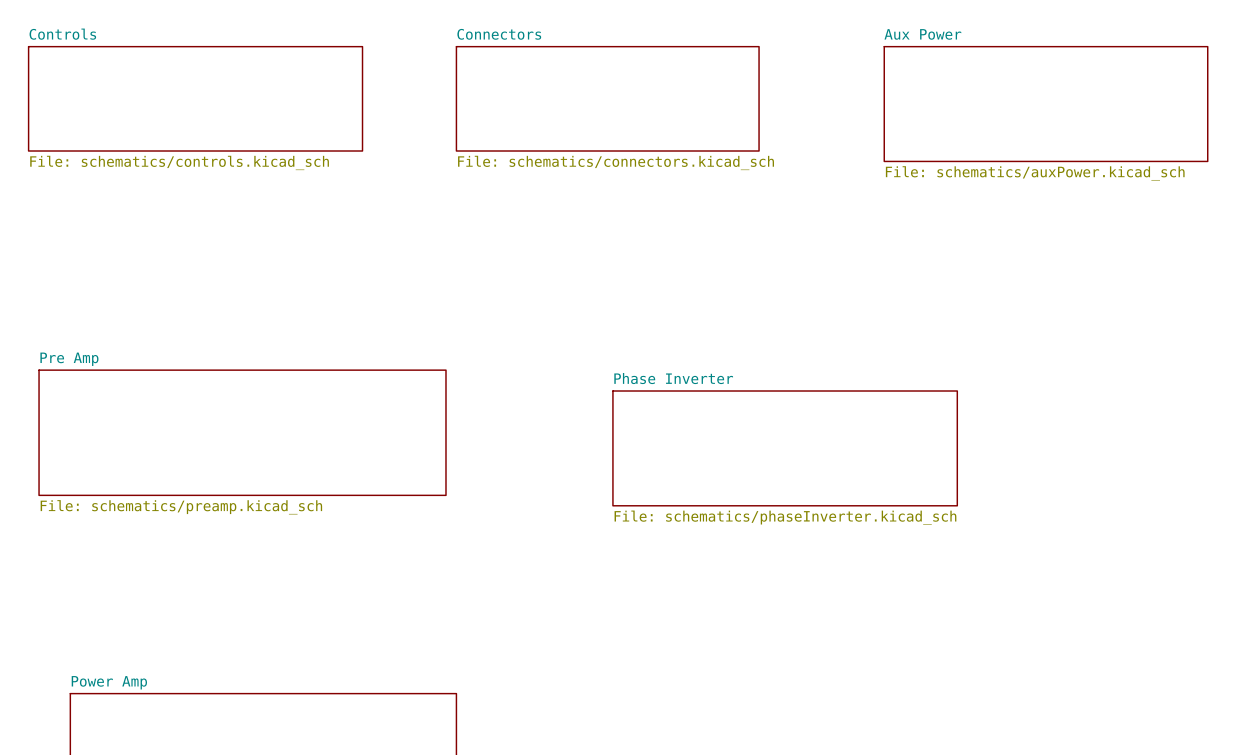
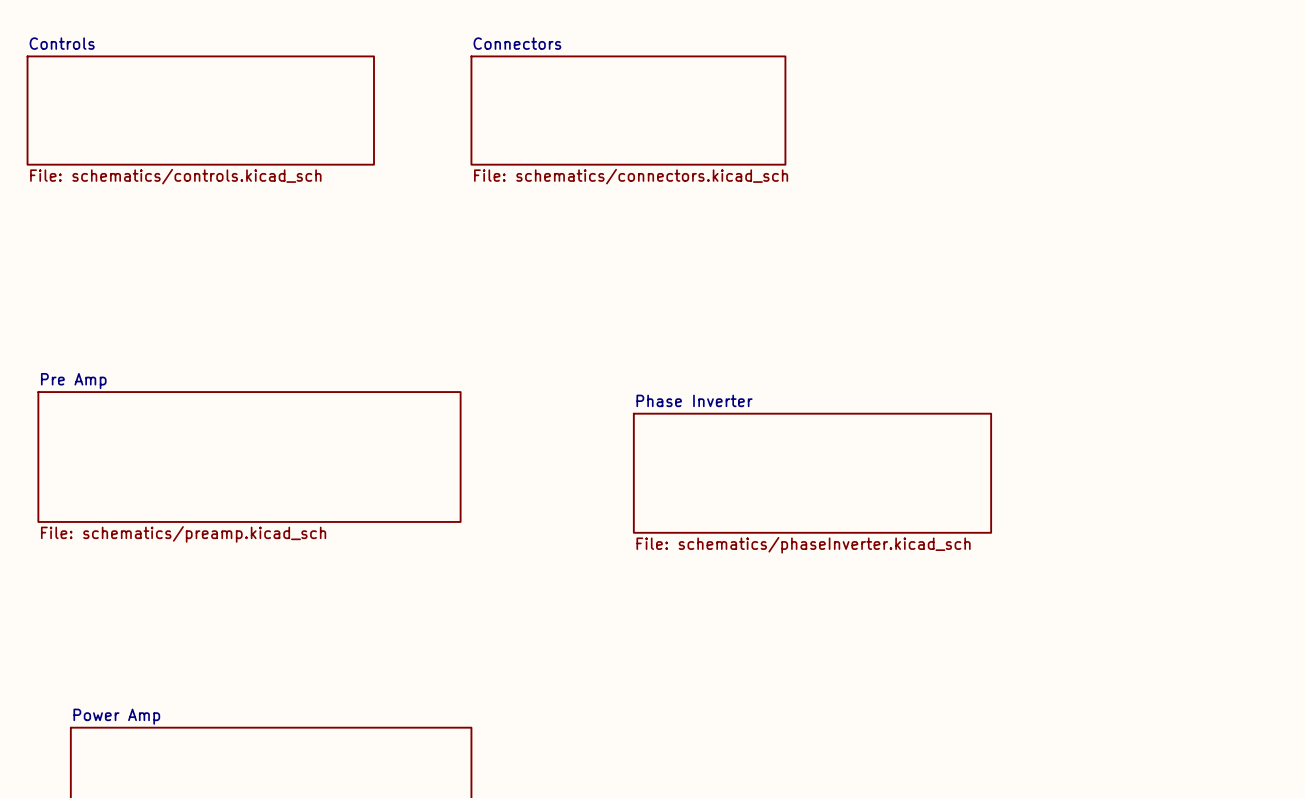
sheet Aux Power: File: schematics/auxPower.kicad_sch (1045, 104) -> none

